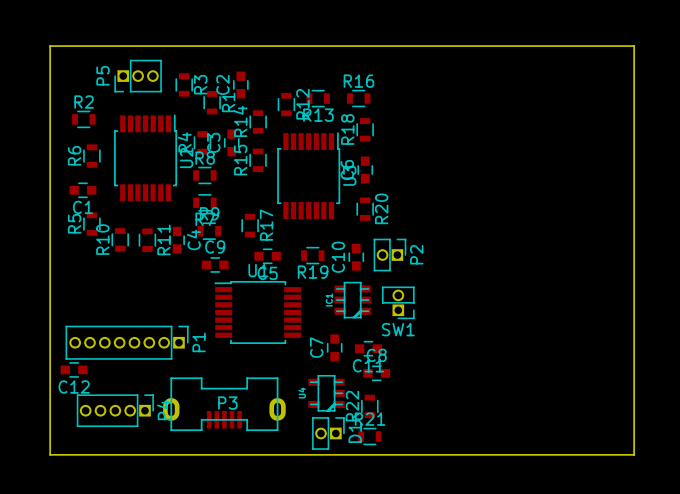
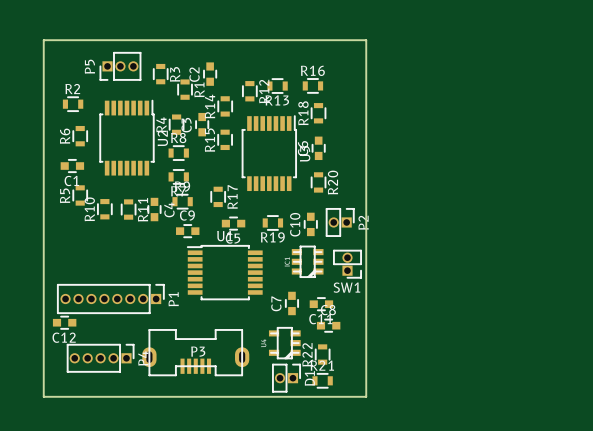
board edge: (419, 46) (634, 46) (634, 454) (419, 454) -> (366, 40) (366, 396)

